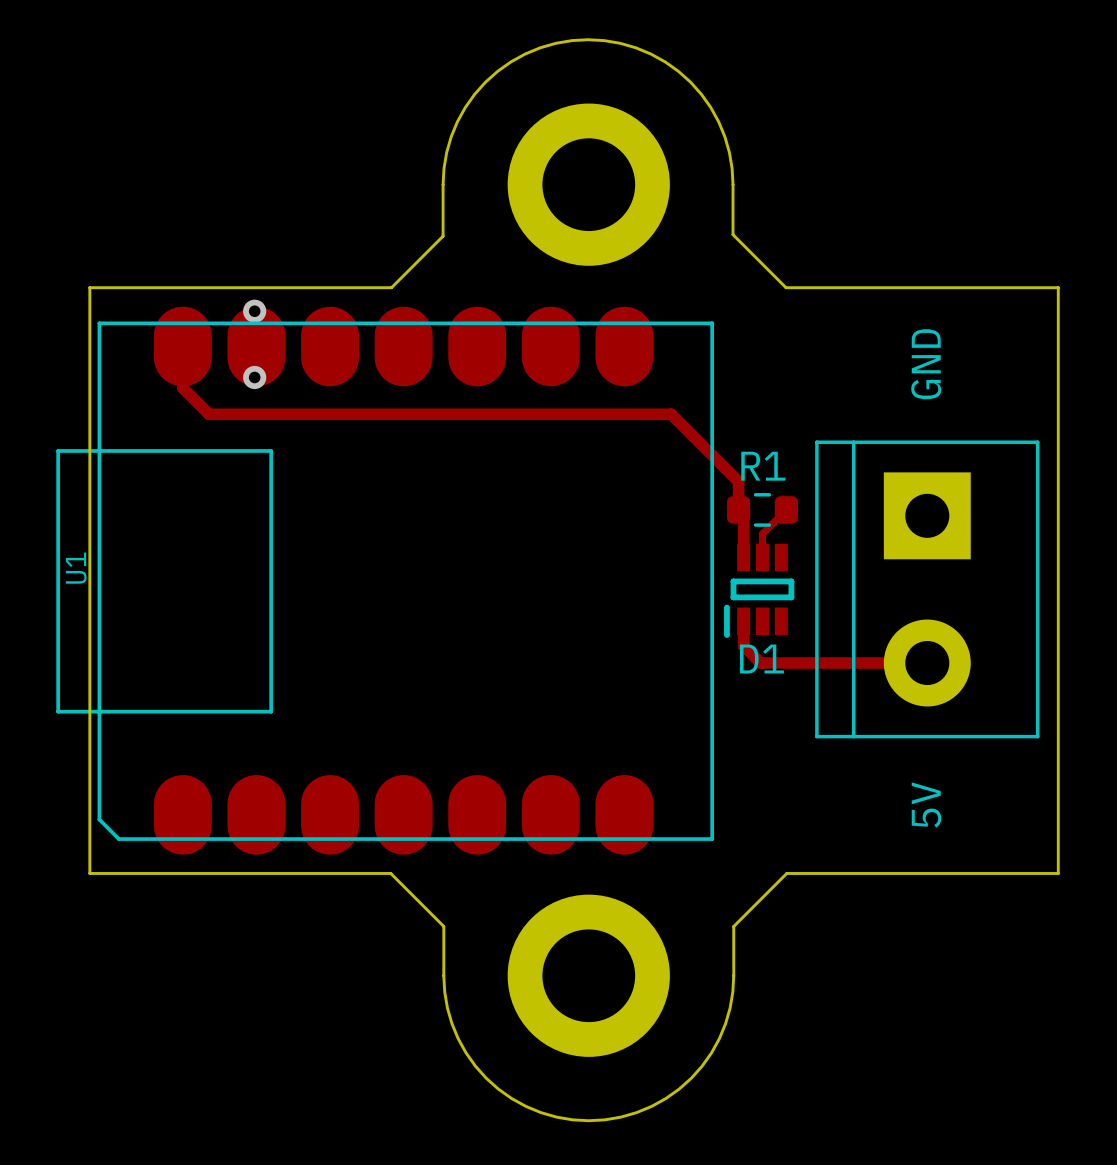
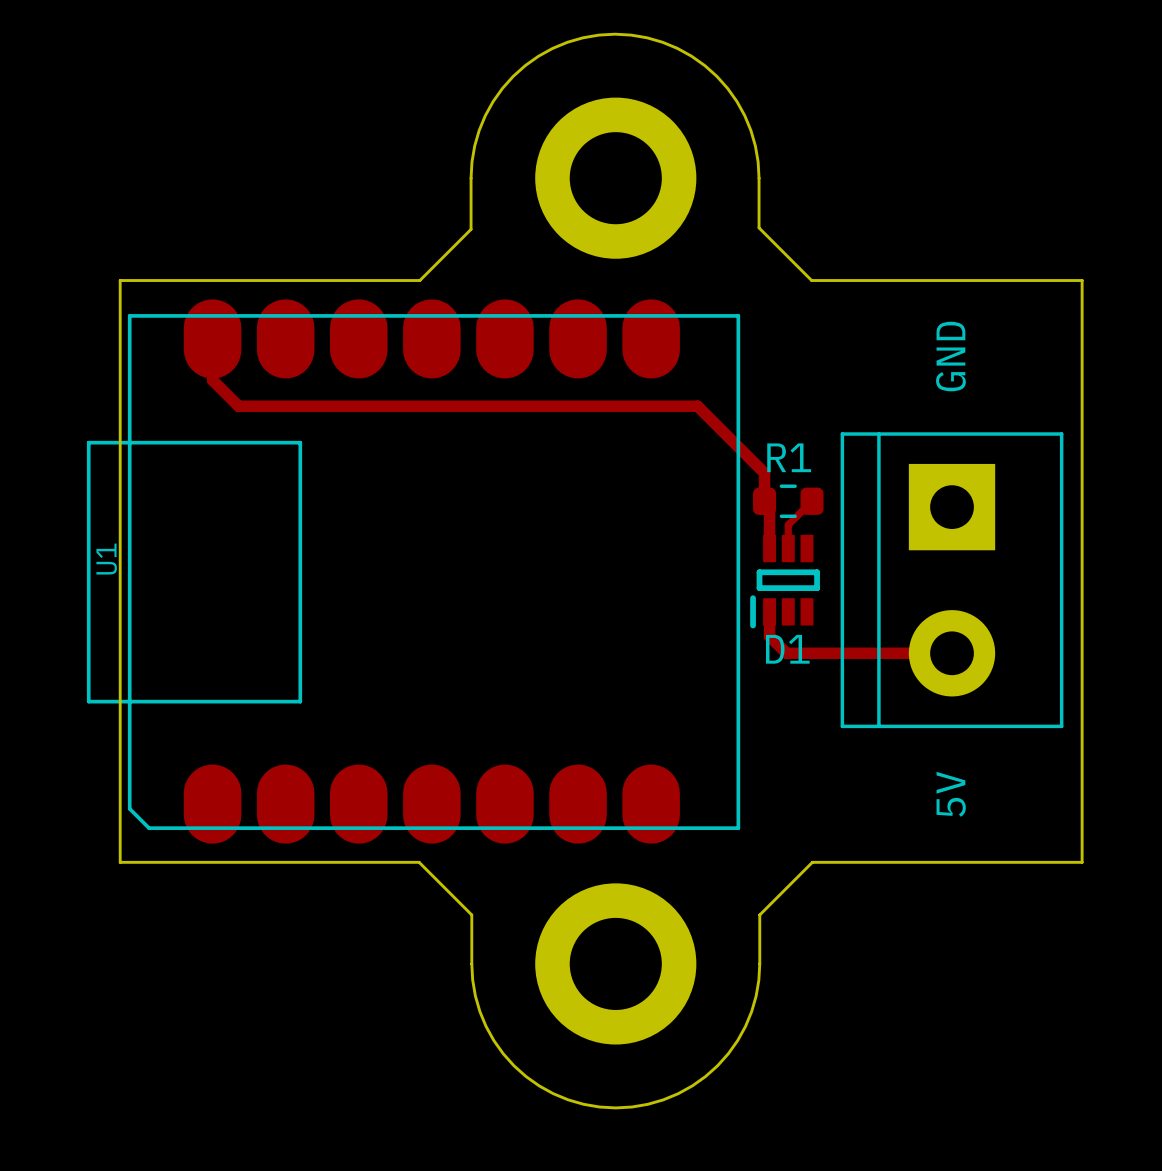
via: (254, 311) -> none
via: (254, 377) -> none

